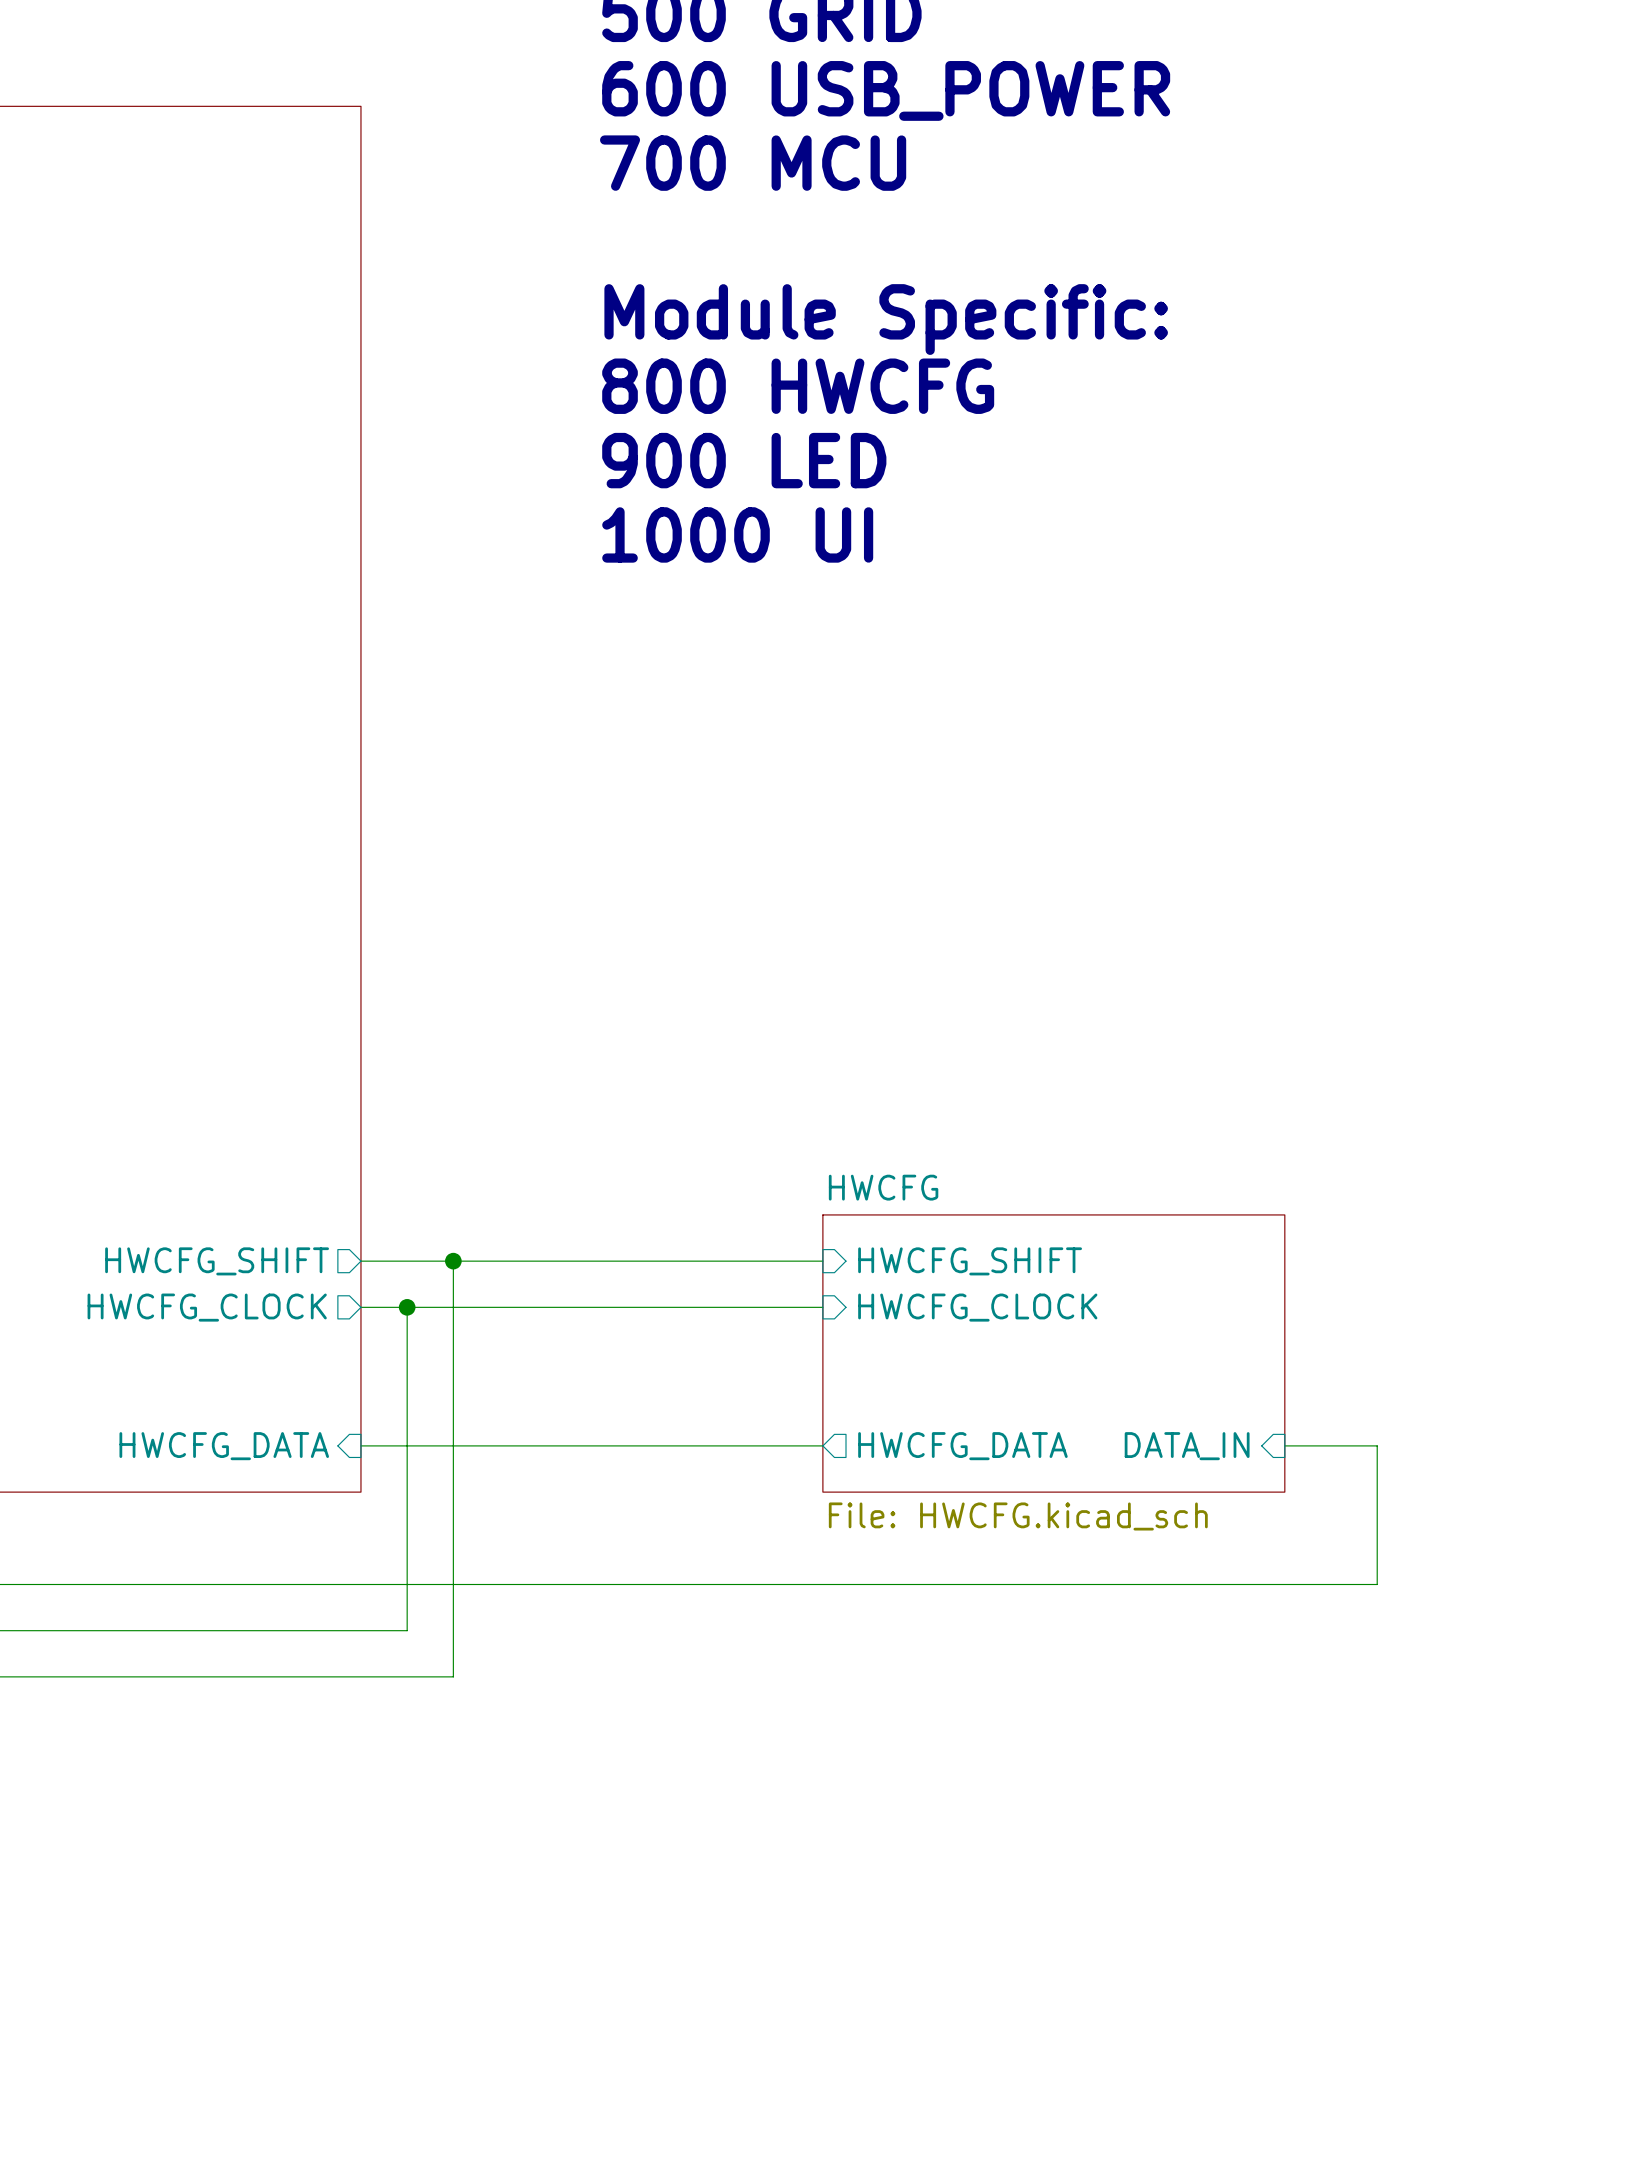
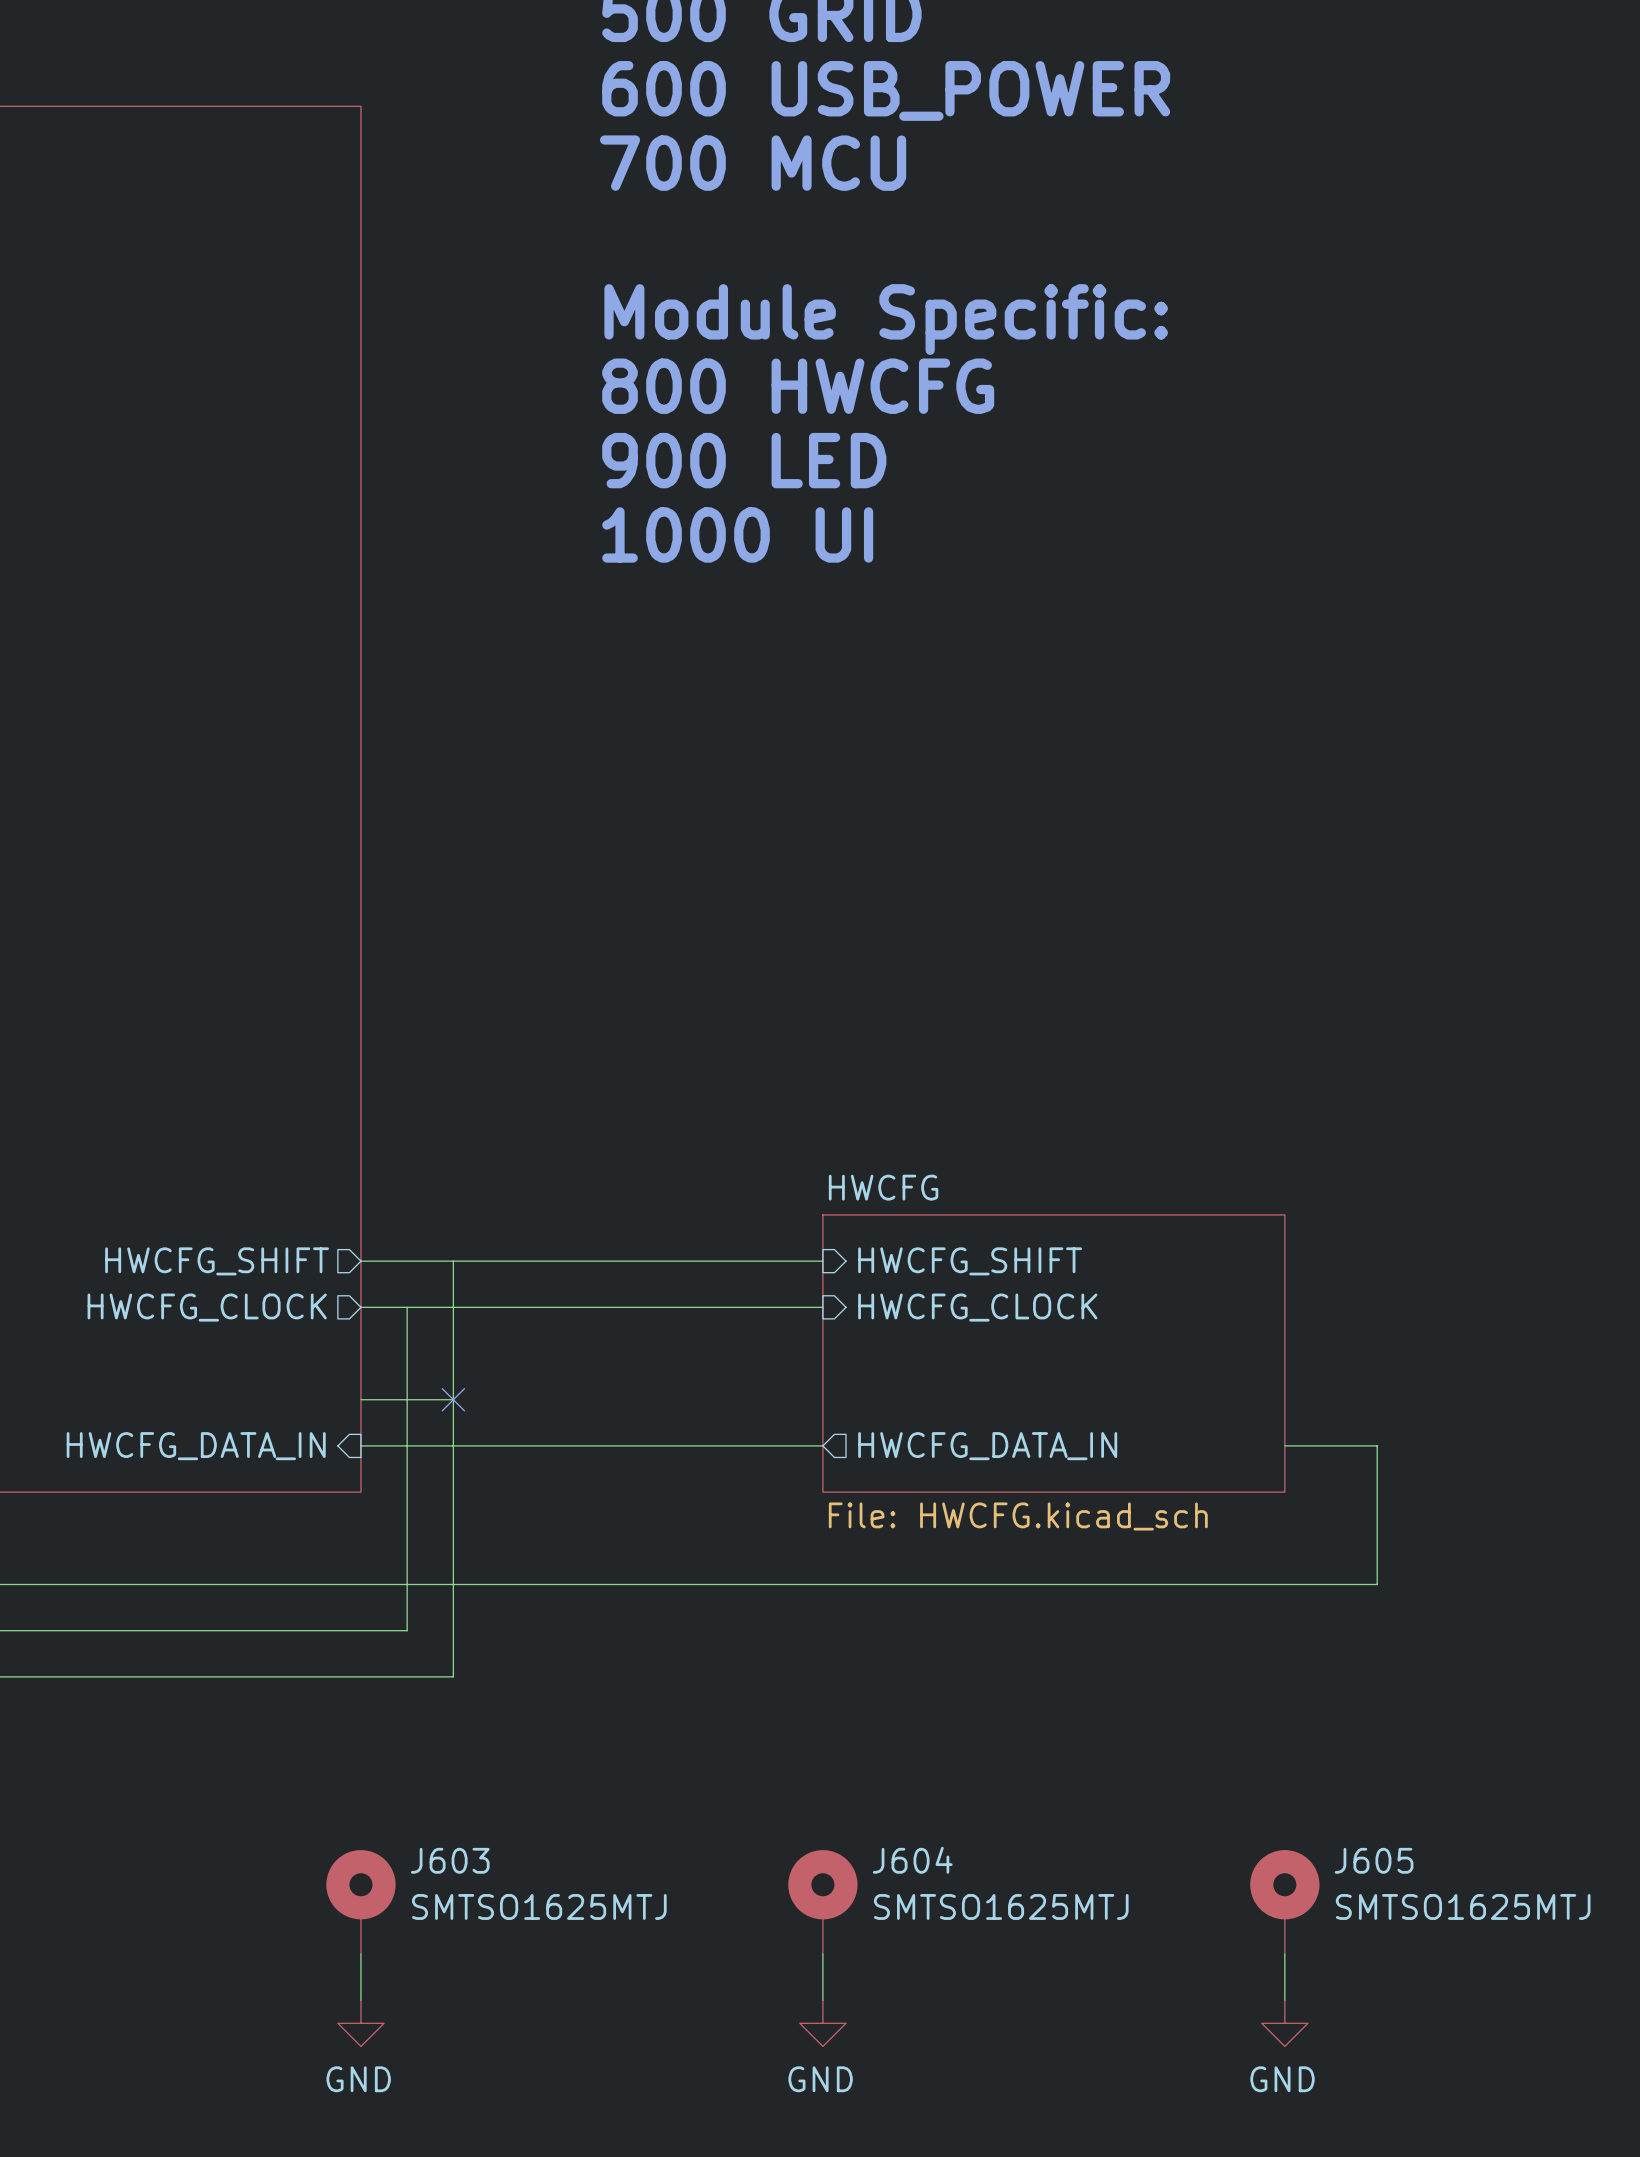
junction: (453, 1261) -> none
junction: (407, 1307) -> none
wire: none -> (360, 1399) (453, 1399)
no-connect mark: none -> (453, 1399)
sheet pin: HWCFG_DATA (224, 1446) -> HWCFG_DATA_IN (196, 1446)
sheet pin: HWCFG_DATA (962, 1446) -> HWCFG_DATA_IN (987, 1446)
sheet pin: DATA_IN (1187, 1446) -> none
J603: none -> SMTSO1625MTJ (360, 1902)
J604: none -> SMTSO1625MTJ (822, 1902)
J605: none -> SMTSO1625MTJ (1284, 1902)
wire: none -> (360, 1954) (360, 2000)
wire: none -> (822, 1954) (822, 2000)
wire: none -> (1284, 1954) (1284, 2000)
power symbol: none -> GND (360, 2023)
power symbol: none -> GND (822, 2023)
power symbol: none -> GND (1284, 2023)

